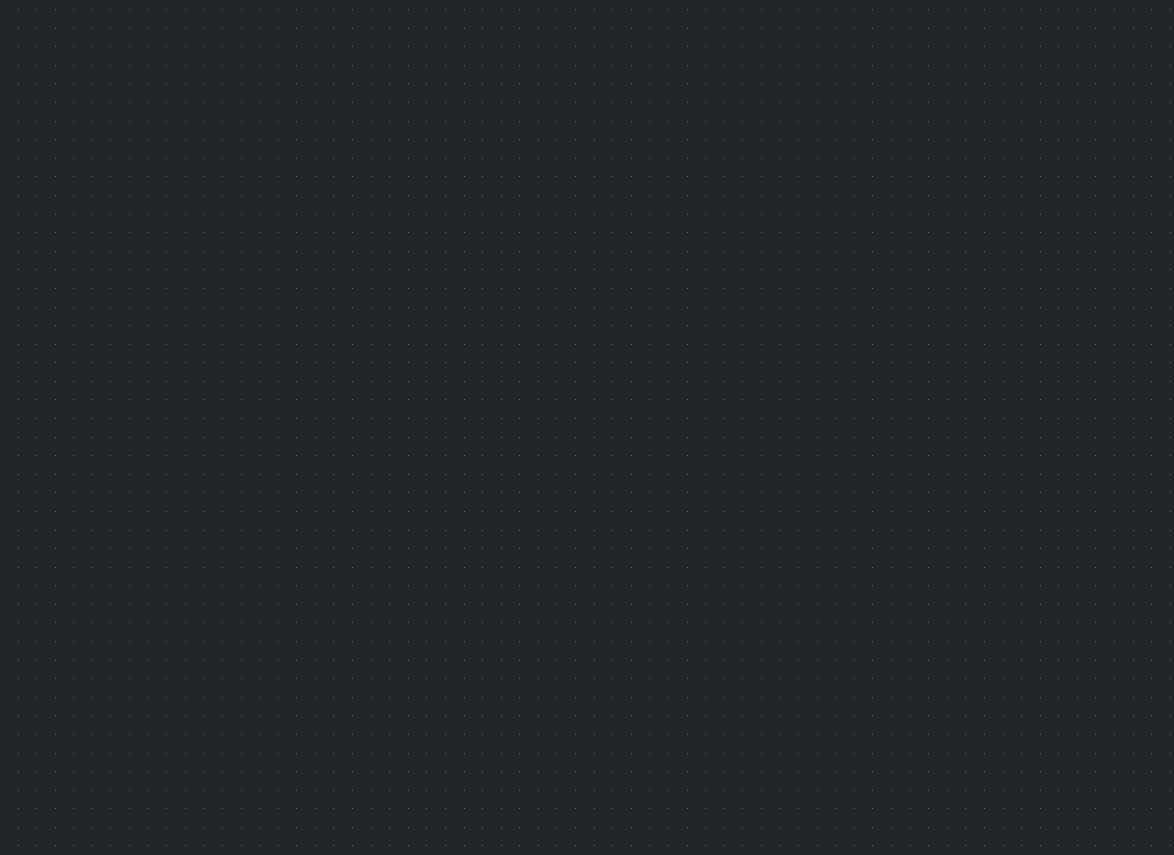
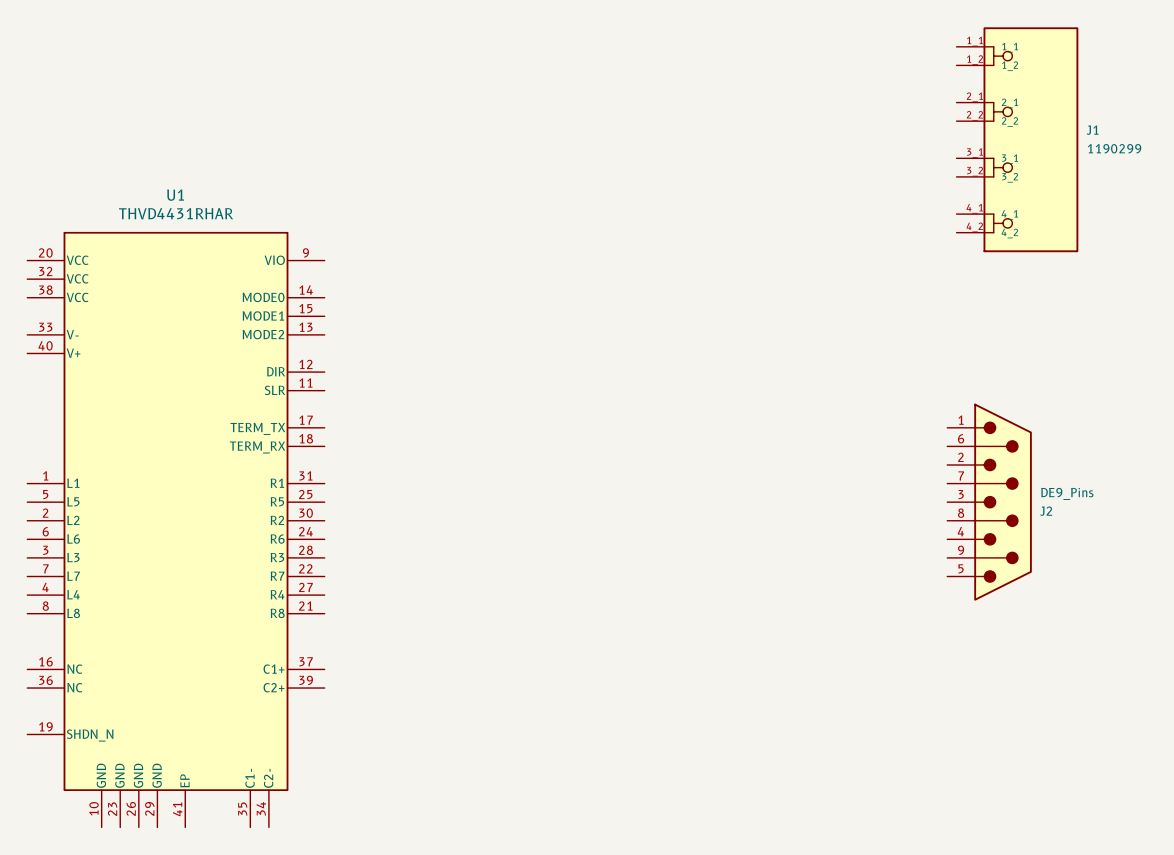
J1: none -> 1190299 (1017, 139)
J2: none -> DE9_Pins (989, 502)
U1: none -> THVD4431RHAR (175, 529)

